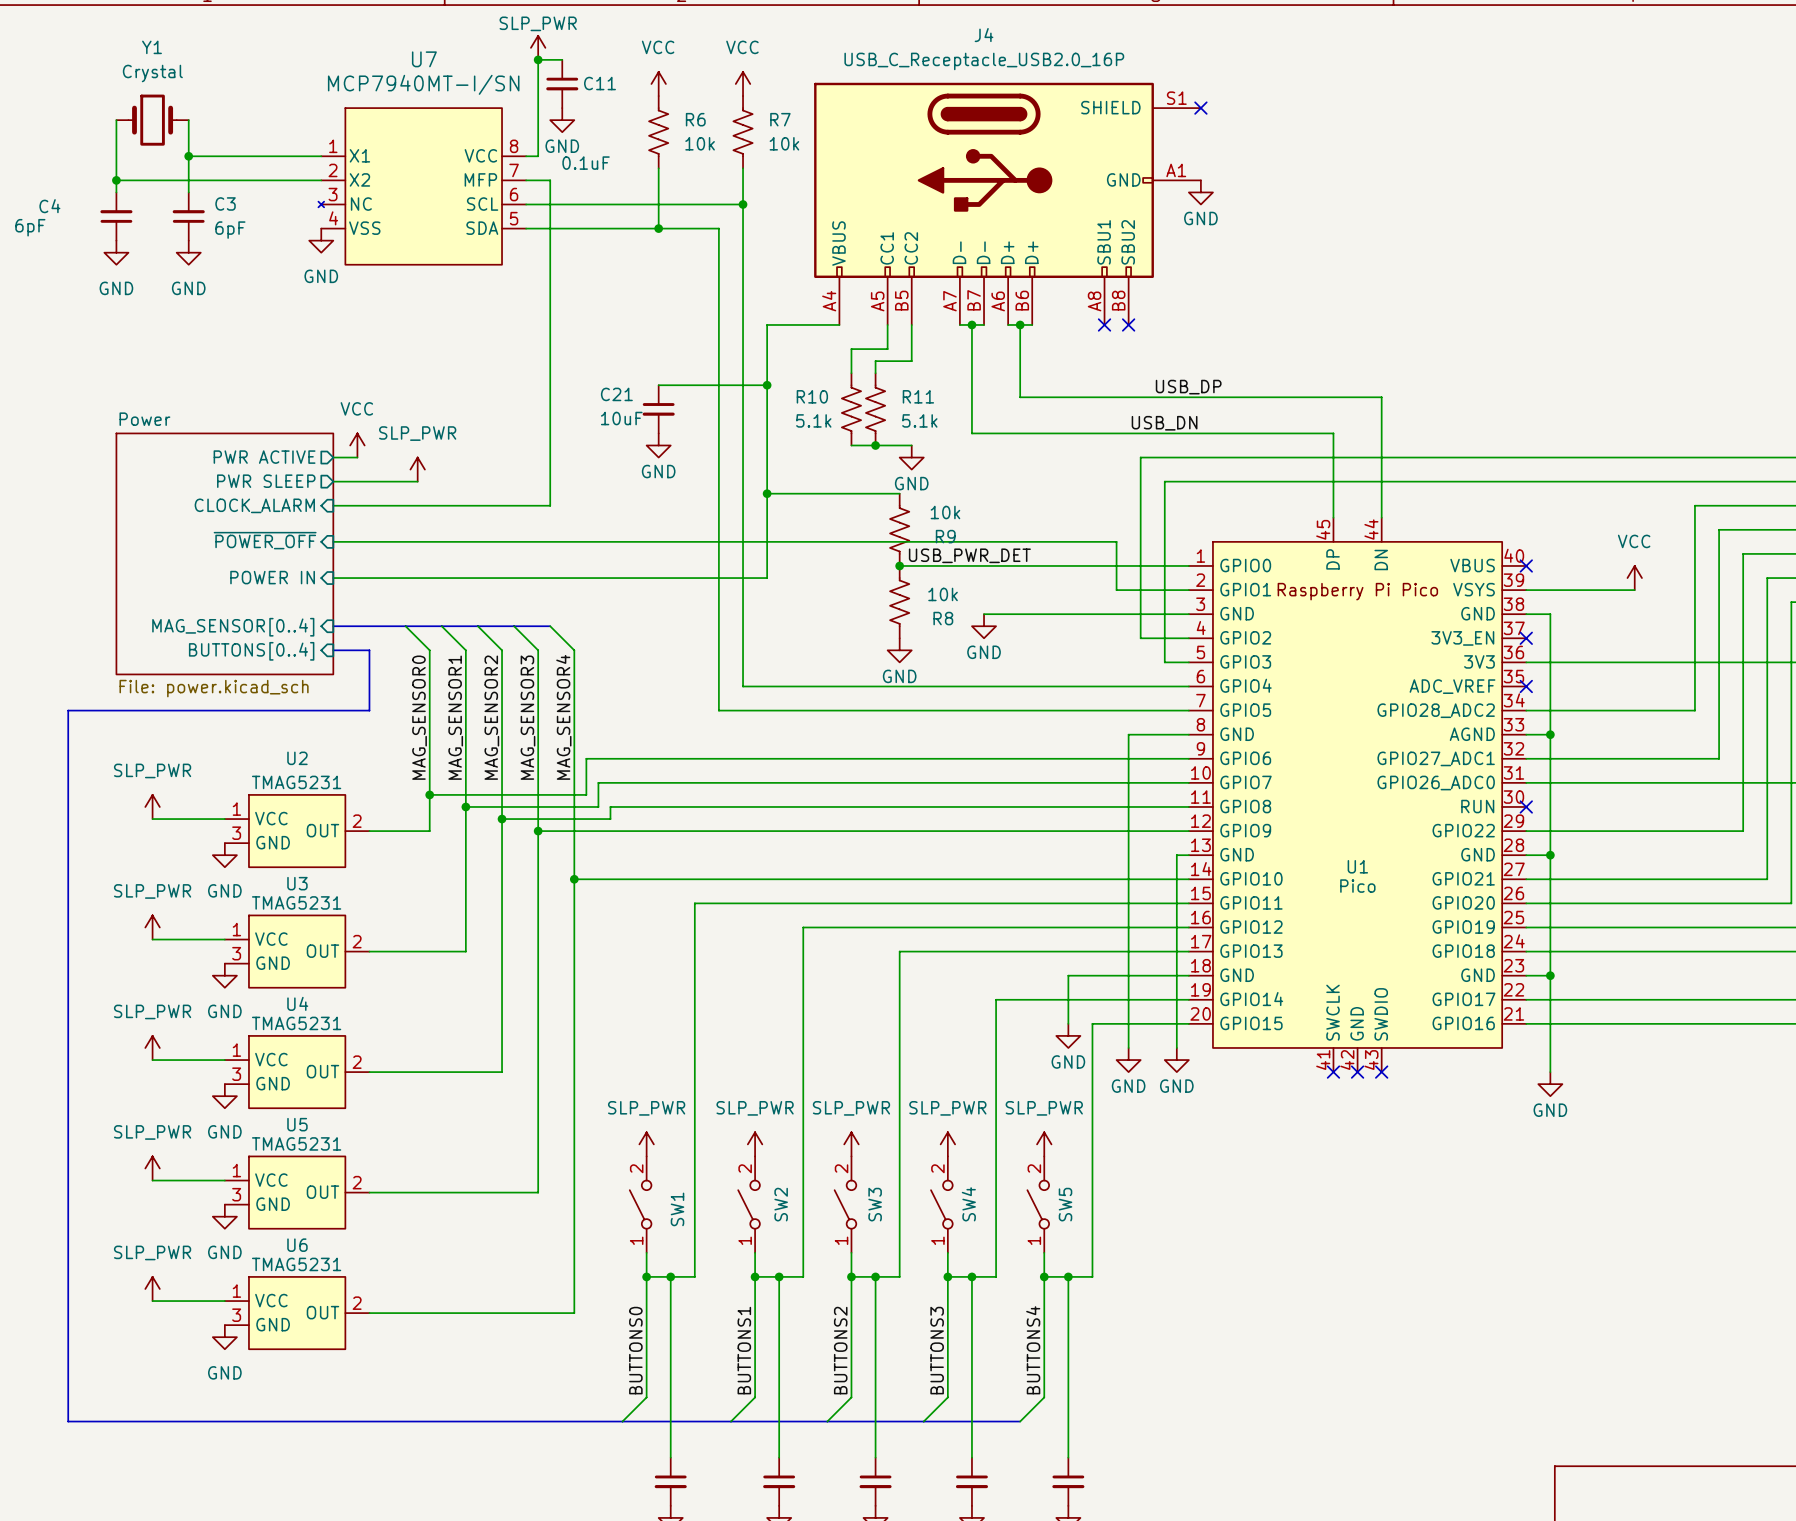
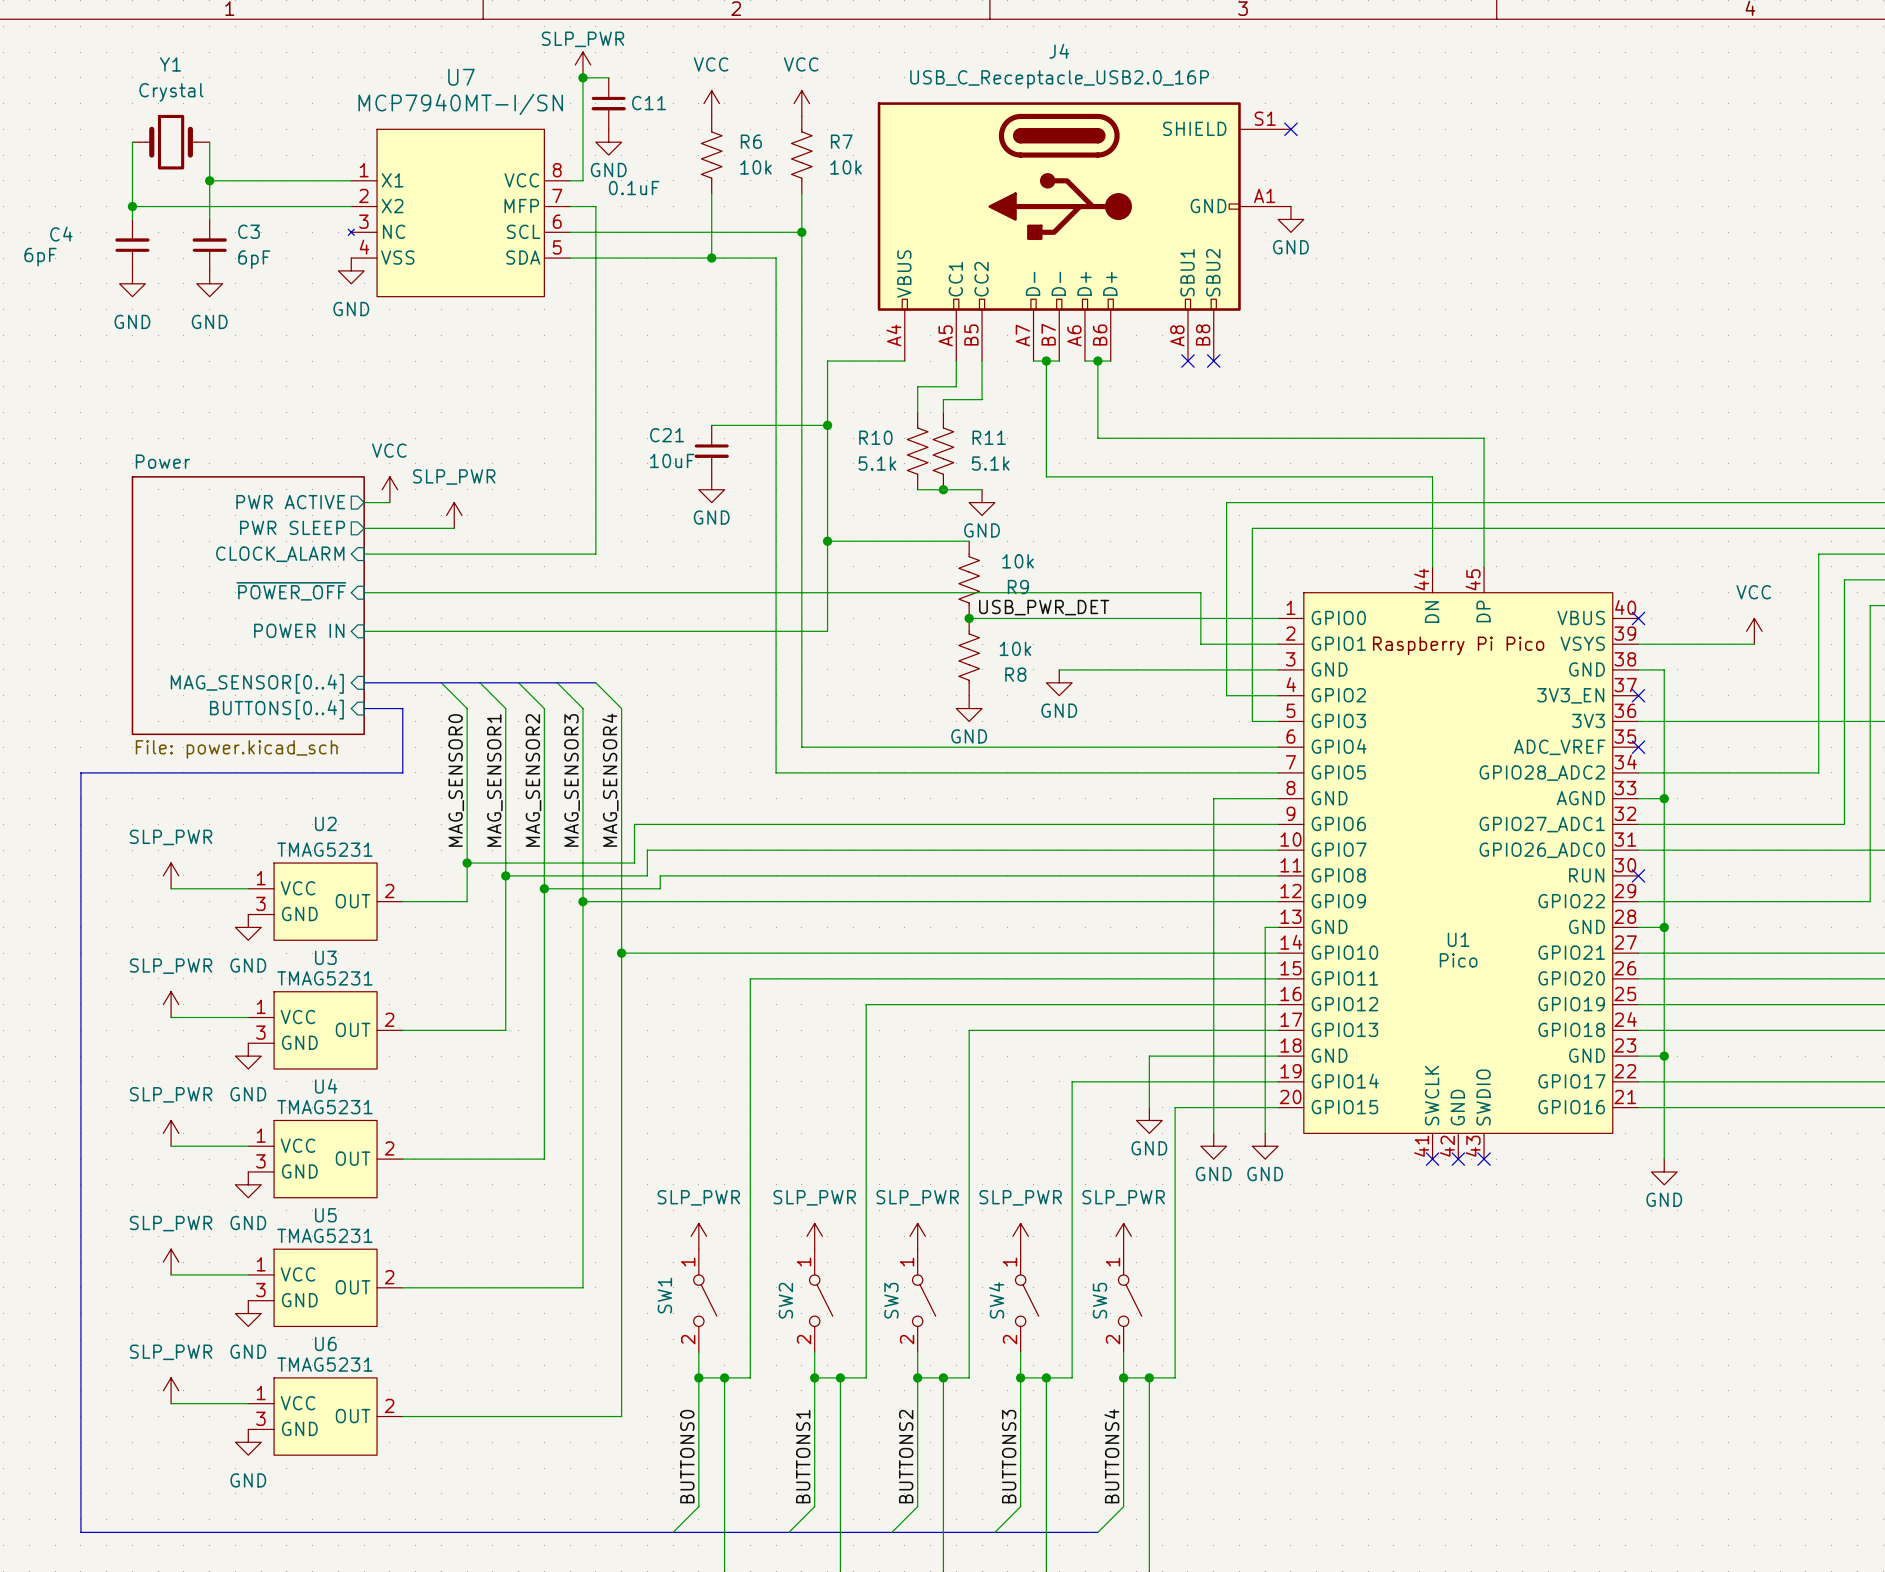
label: USB_DP (1188, 387) -> none
label: USB_DN (1164, 423) -> none
U1 pin number: 45 (1323, 529) -> 44 (1421, 579)
U1 pin number: 44 (1371, 529) -> 45 (1473, 579)
U1 pin name: DP (1333, 559) -> DN (1432, 612)
U1 pin name: DN (1381, 559) -> DP (1483, 611)
SW1 rotation: 0° (640, 1204) -> 180° (705, 1300)
SW2 rotation: 0° (749, 1204) -> 180° (821, 1300)
SW3 rotation: 0° (845, 1204) -> 180° (924, 1300)
SW4 rotation: 0° (941, 1204) -> 180° (1027, 1300)
SW5 rotation: 0° (1038, 1204) -> 180° (1130, 1300)

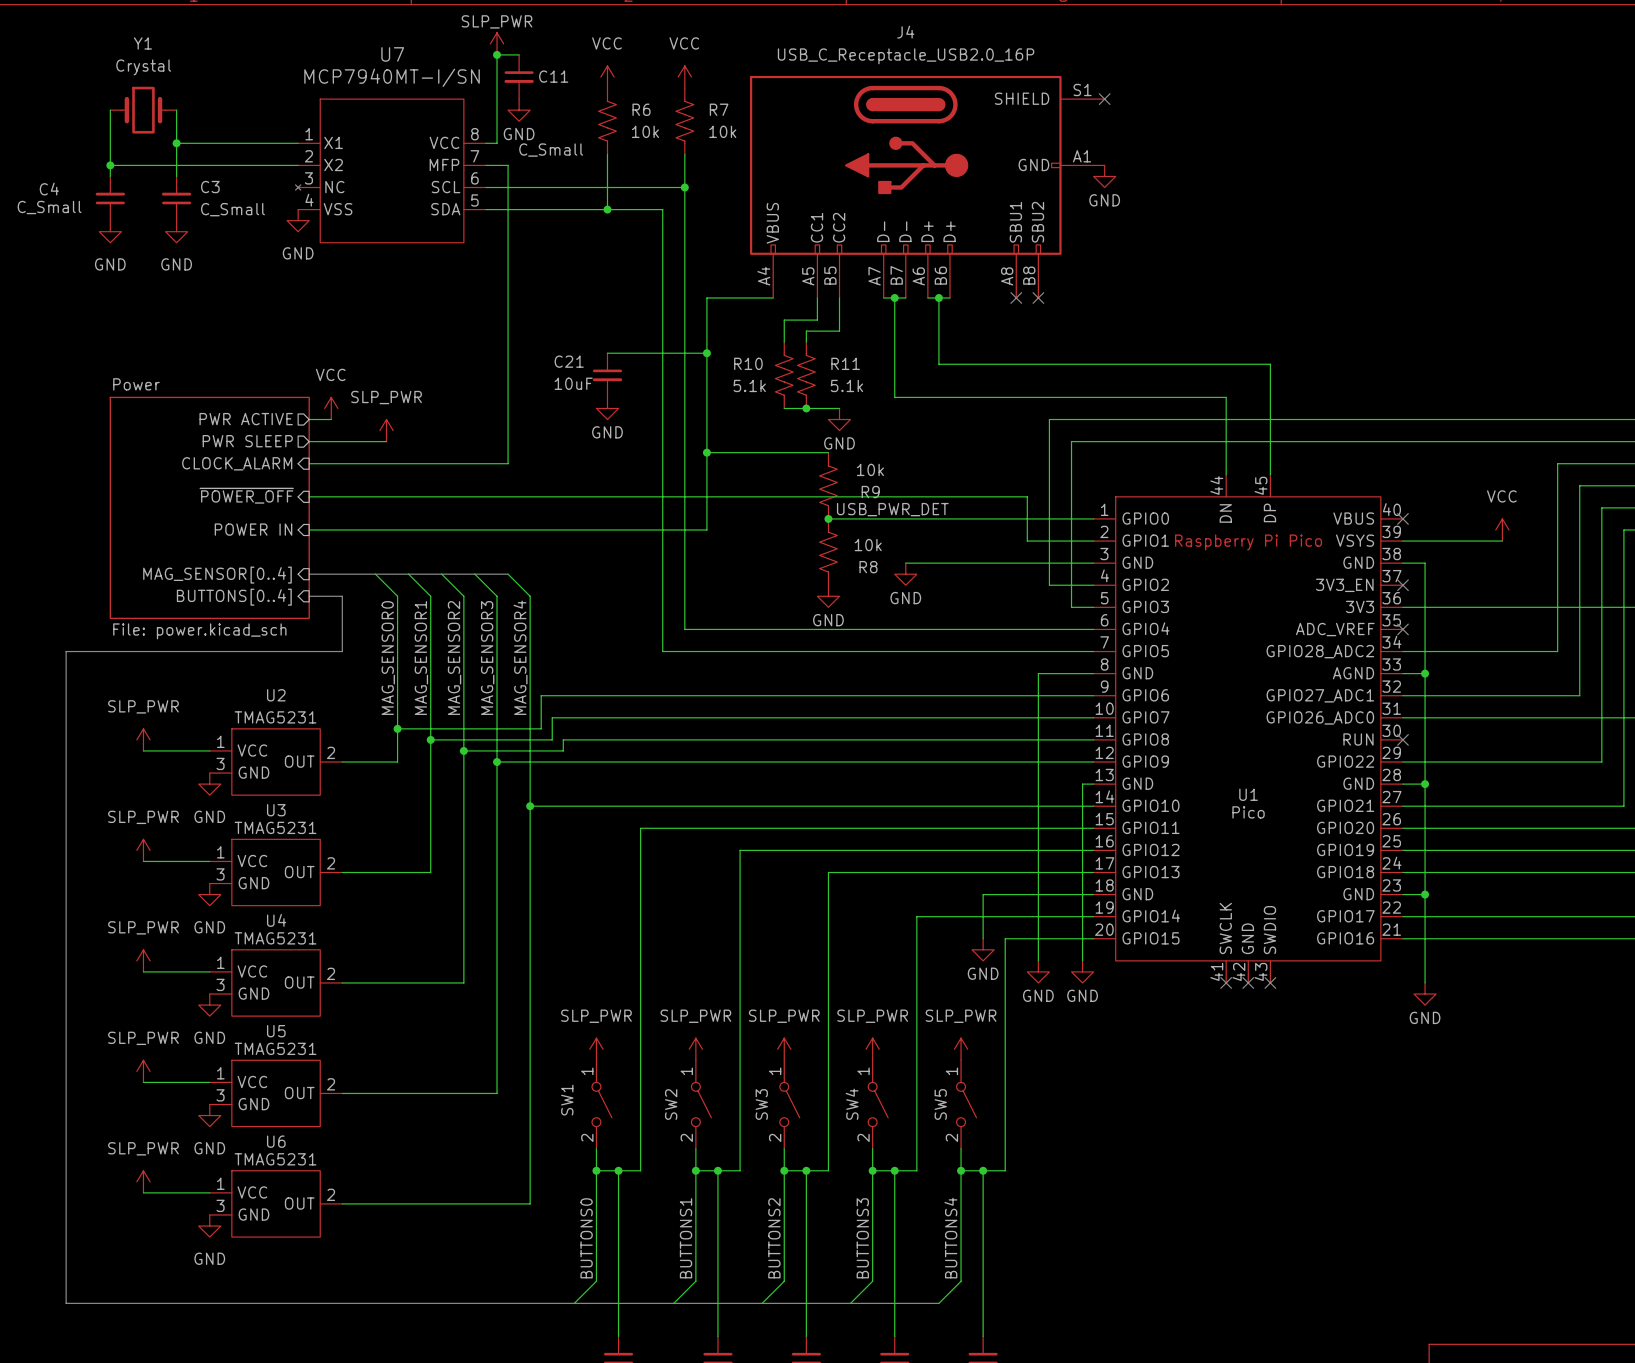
C11 value: 0.1uF (634, 188) -> C_Small (551, 150)
C4 value: 6pF (40, 257) -> C_Small (49, 207)
C3 value: 6pF (254, 259) -> C_Small (232, 209)

